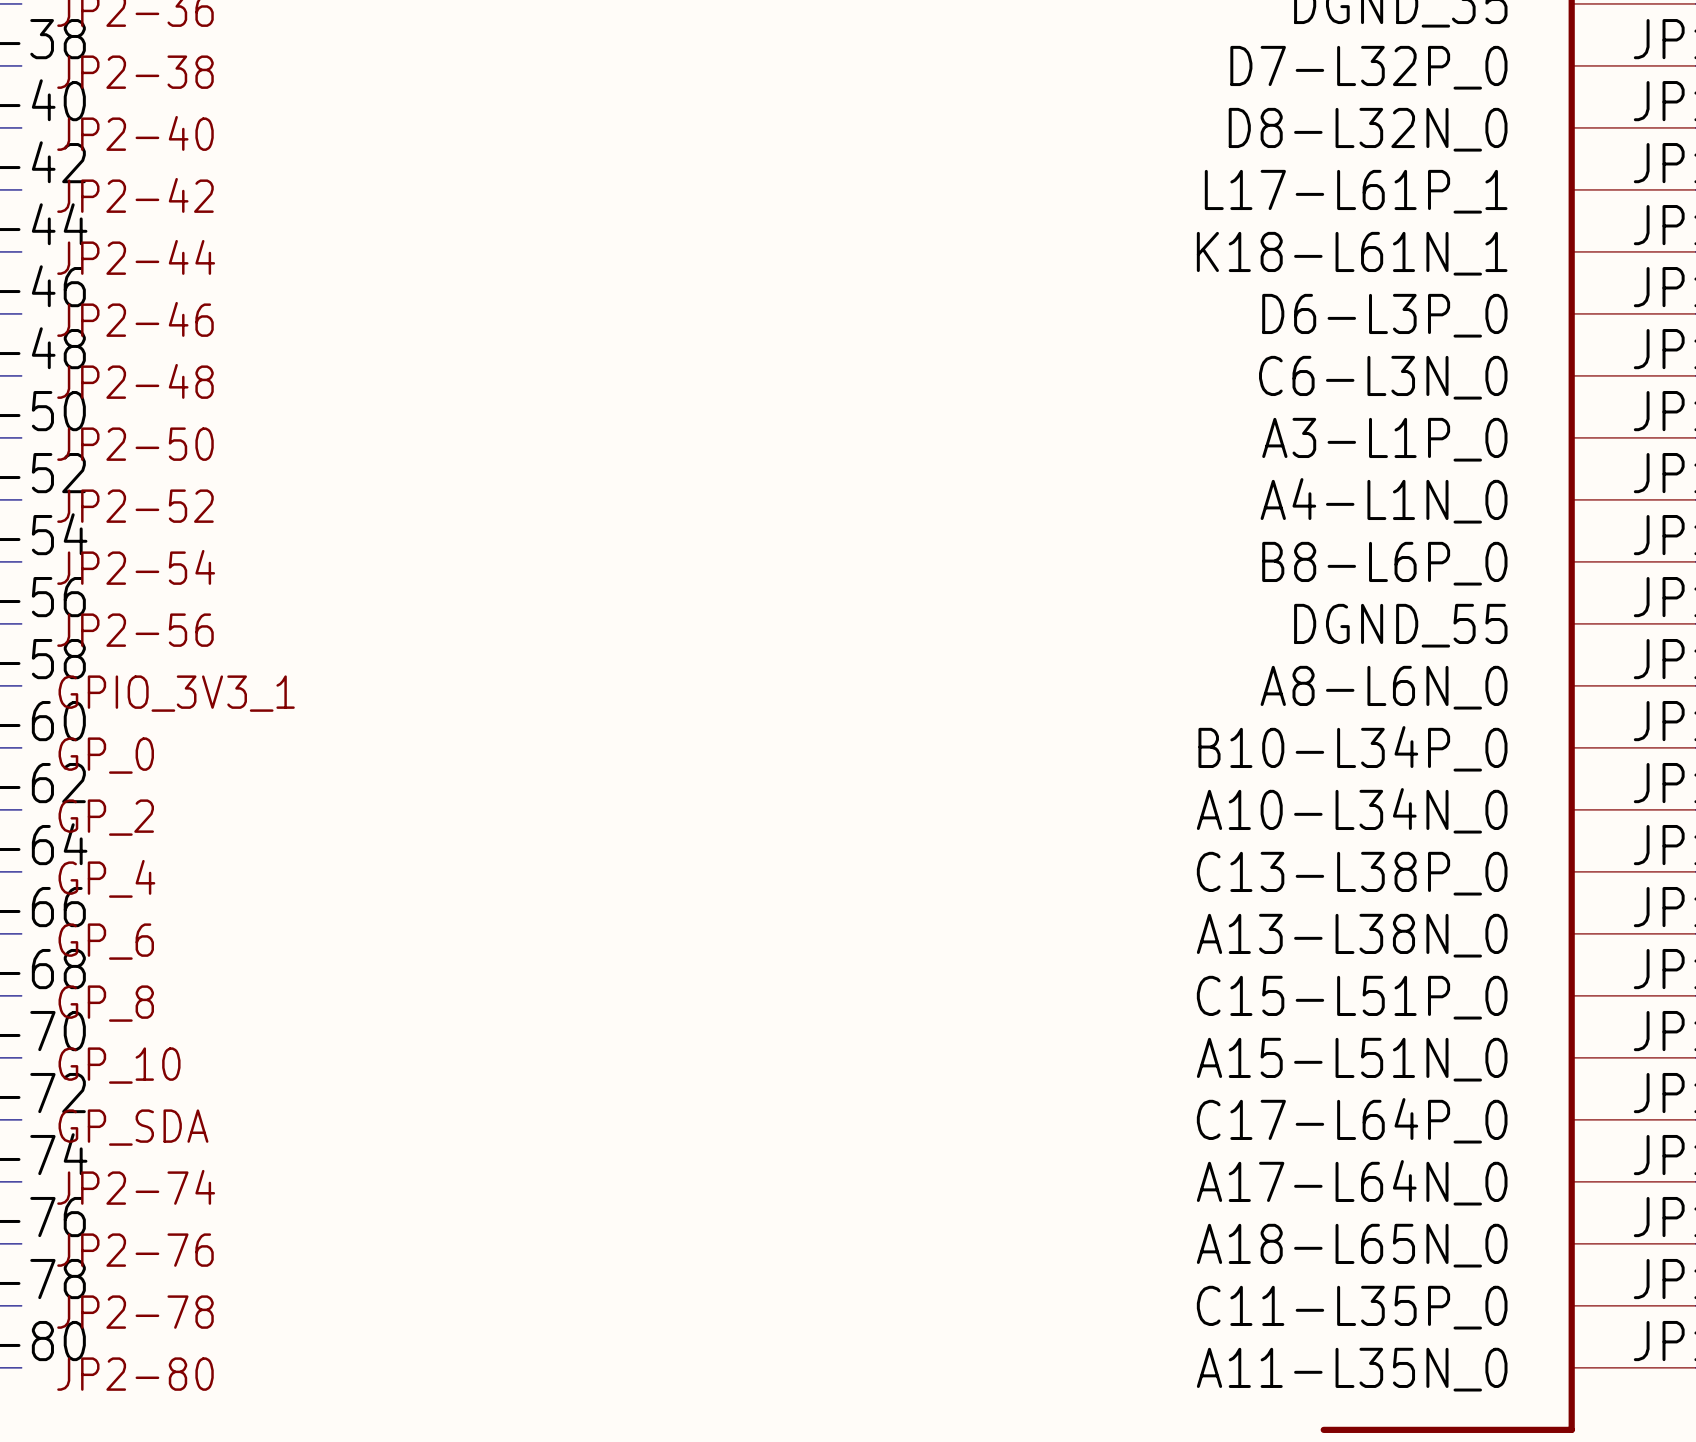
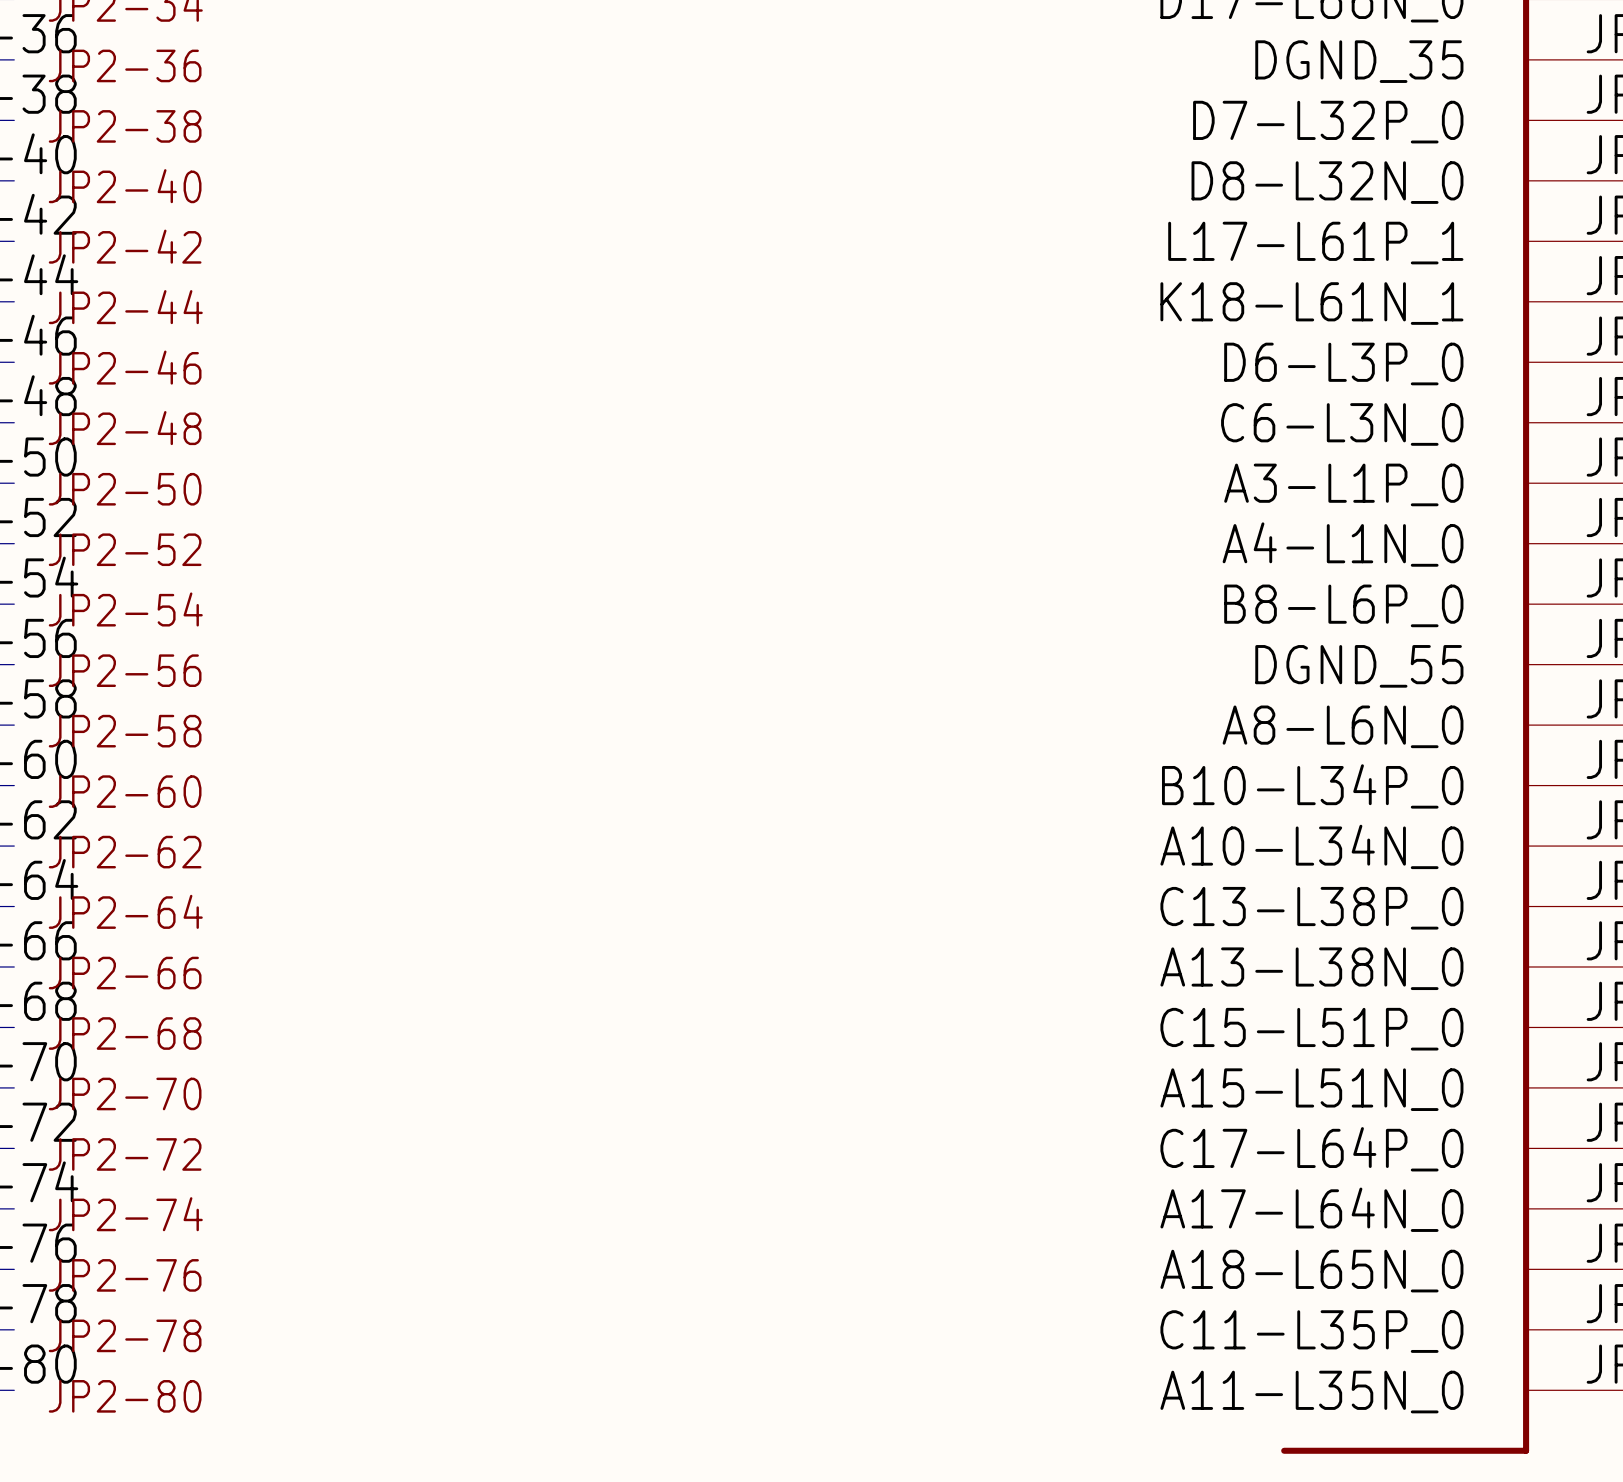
label: GPIO_3V3_1 (176, 693) -> JP2-58 (125, 731)
label: GP_0 (106, 755) -> JP2-60 (125, 791)
label: GP_2 (106, 817) -> JP2-62 (125, 852)
label: GP_4 (106, 878) -> JP2-64 (125, 911)
label: GP_6 (106, 941) -> JP2-66 (125, 973)
label: GP_8 (106, 1003) -> JP2-68 (125, 1033)
label: GP_10 (119, 1065) -> JP2-70 (125, 1093)
label: GP_SDA (133, 1127) -> JP2-72 (125, 1154)

